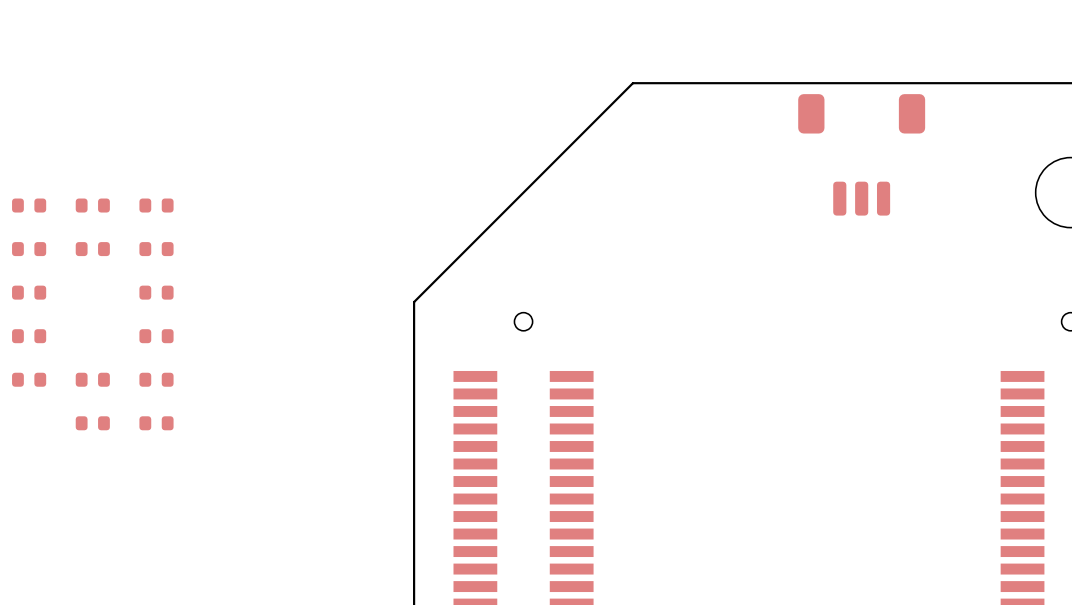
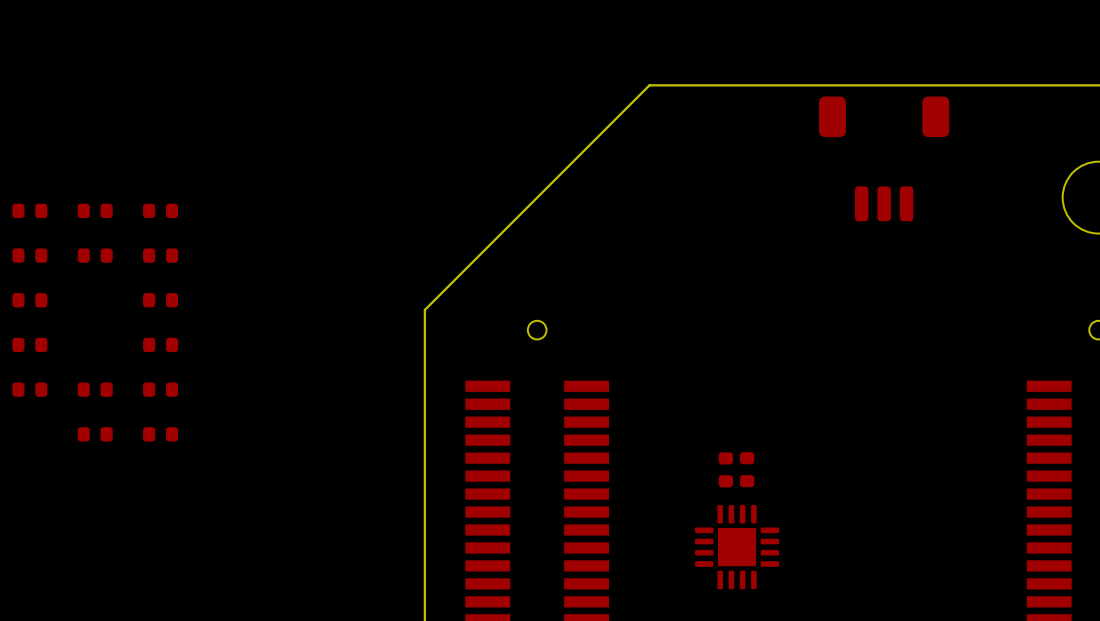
part: none -> (725, 469)
part: none -> (747, 469)
part: none -> (737, 547)

